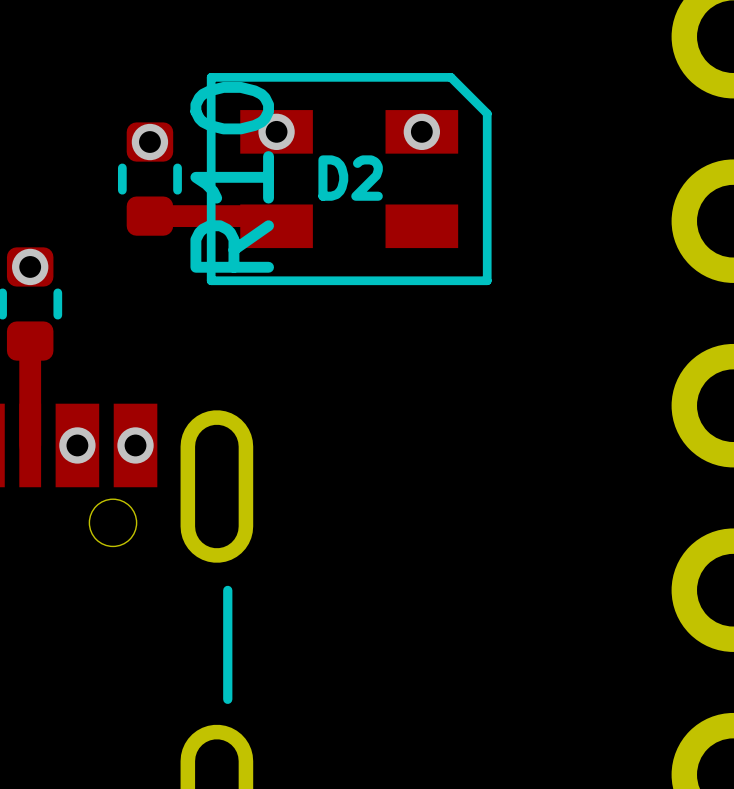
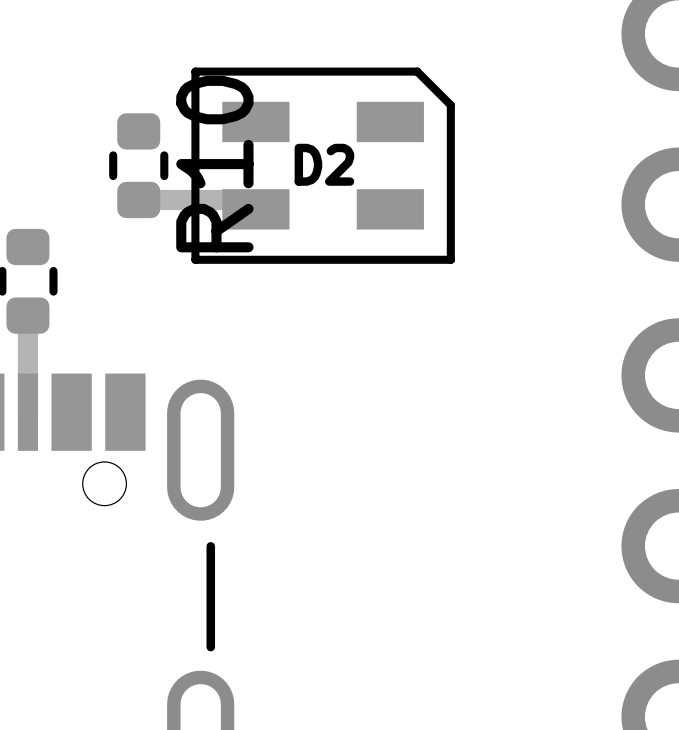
via: (276, 131) -> none
via: (421, 131) -> none
via: (149, 142) -> none
via: (30, 266) -> none
via: (77, 445) -> none
via: (135, 445) -> none

